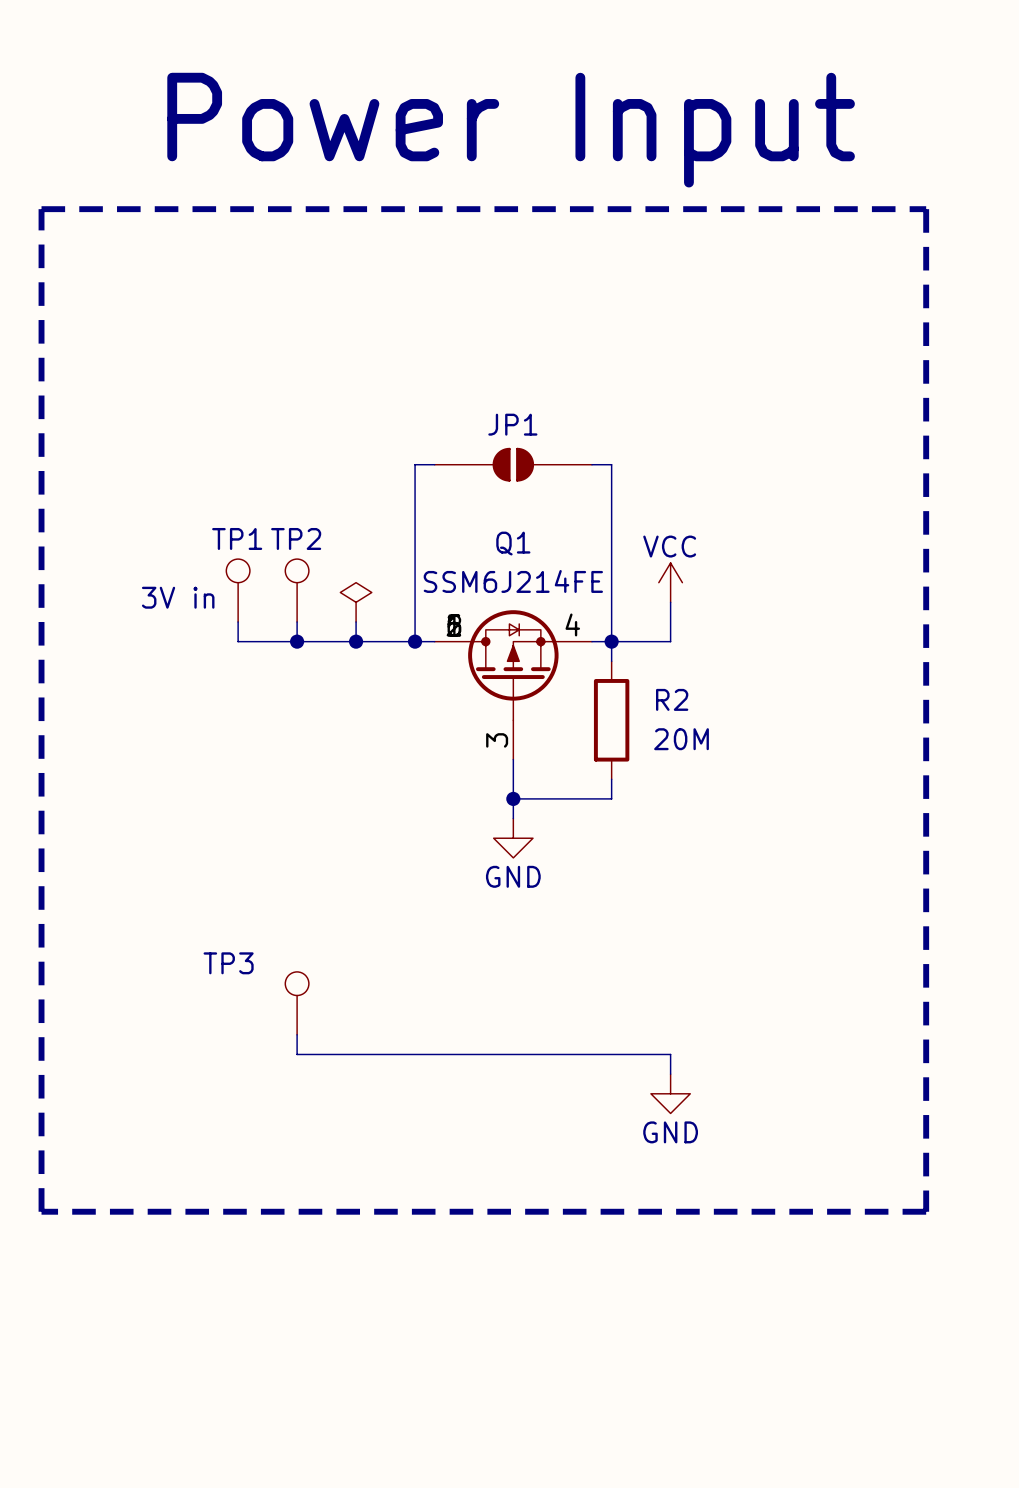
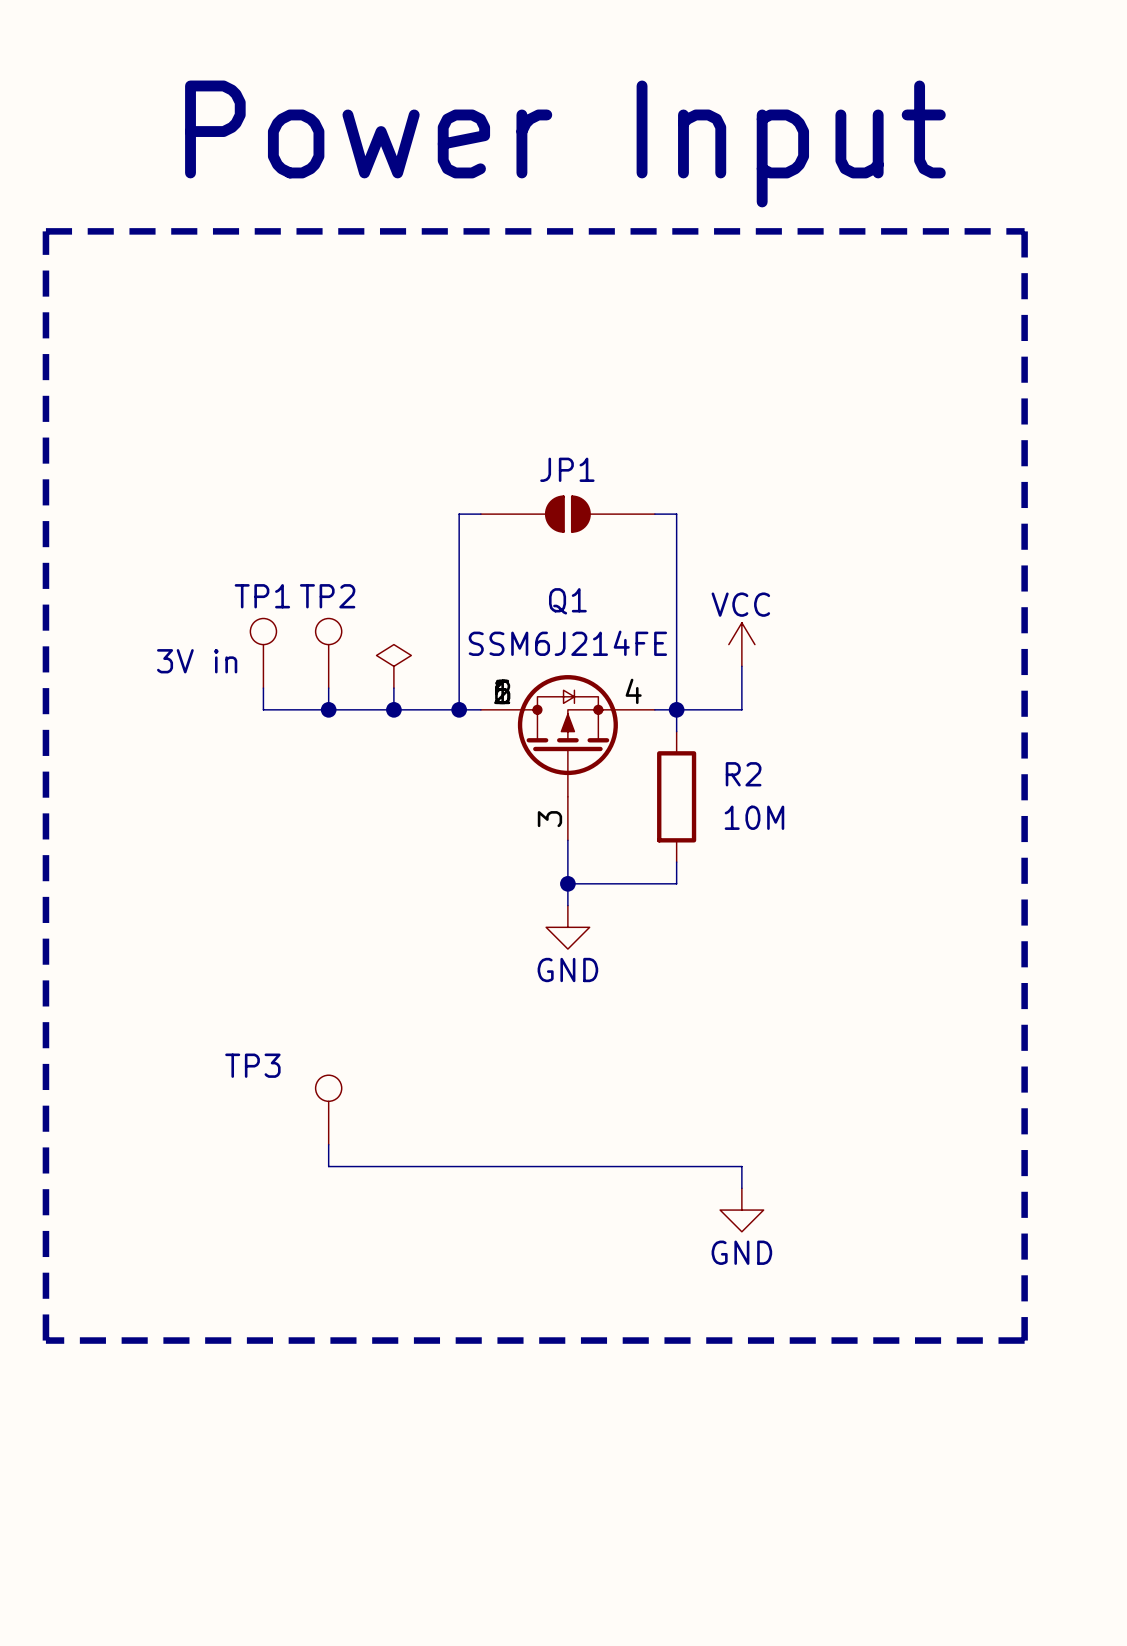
R2 value: 20M (681, 739) -> 10M (754, 817)

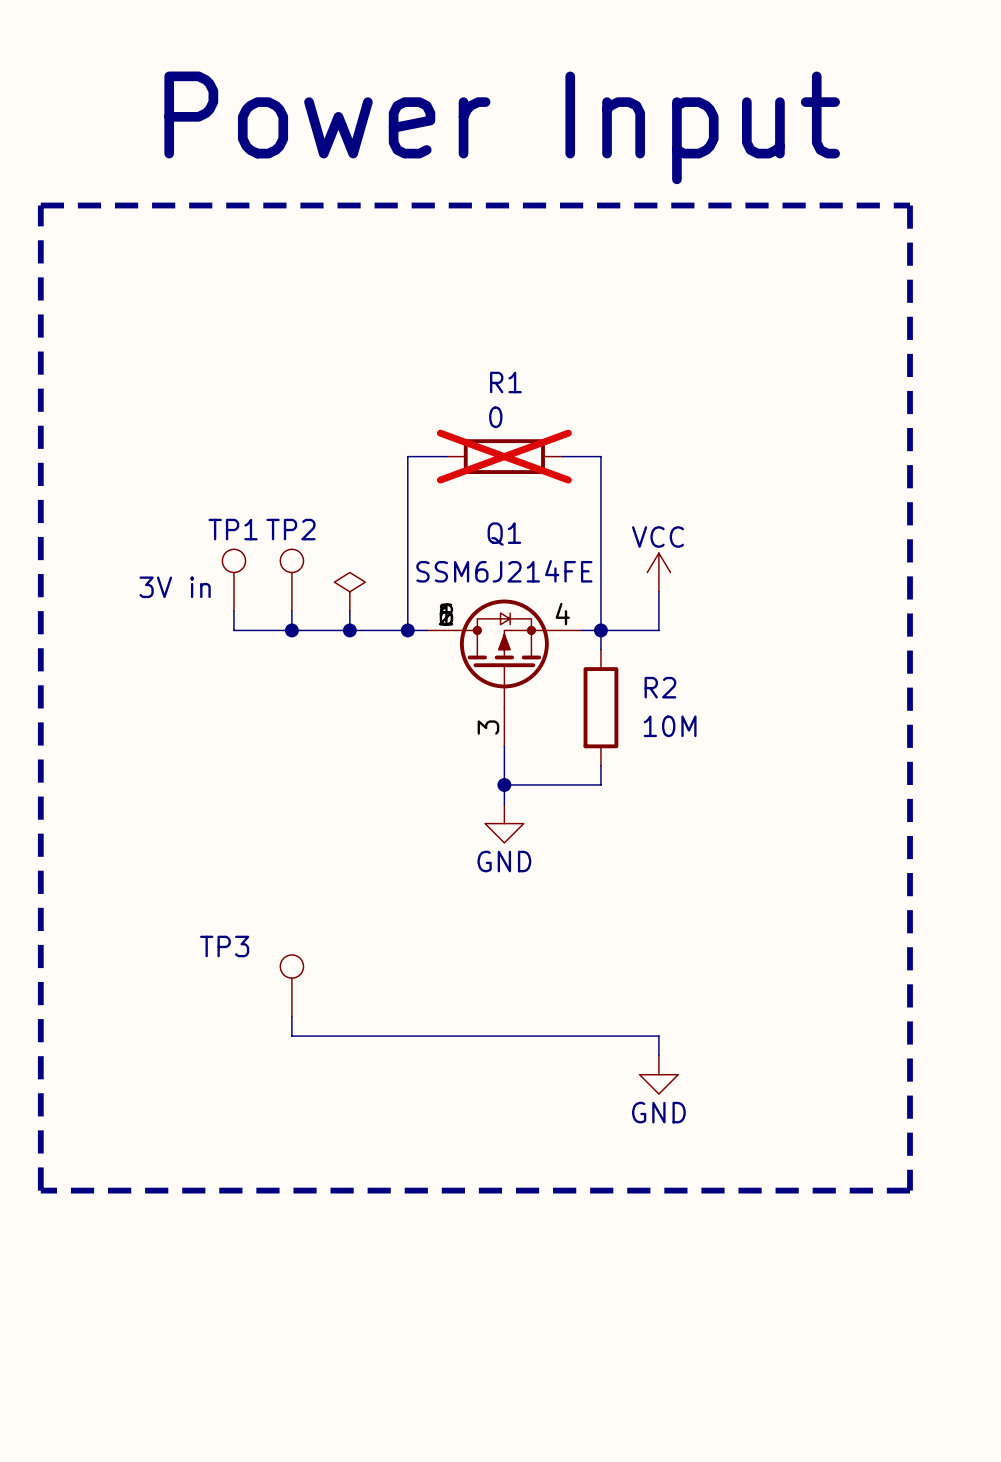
JP1: (567, 514) -> none
R1: none -> 0 (504, 456)

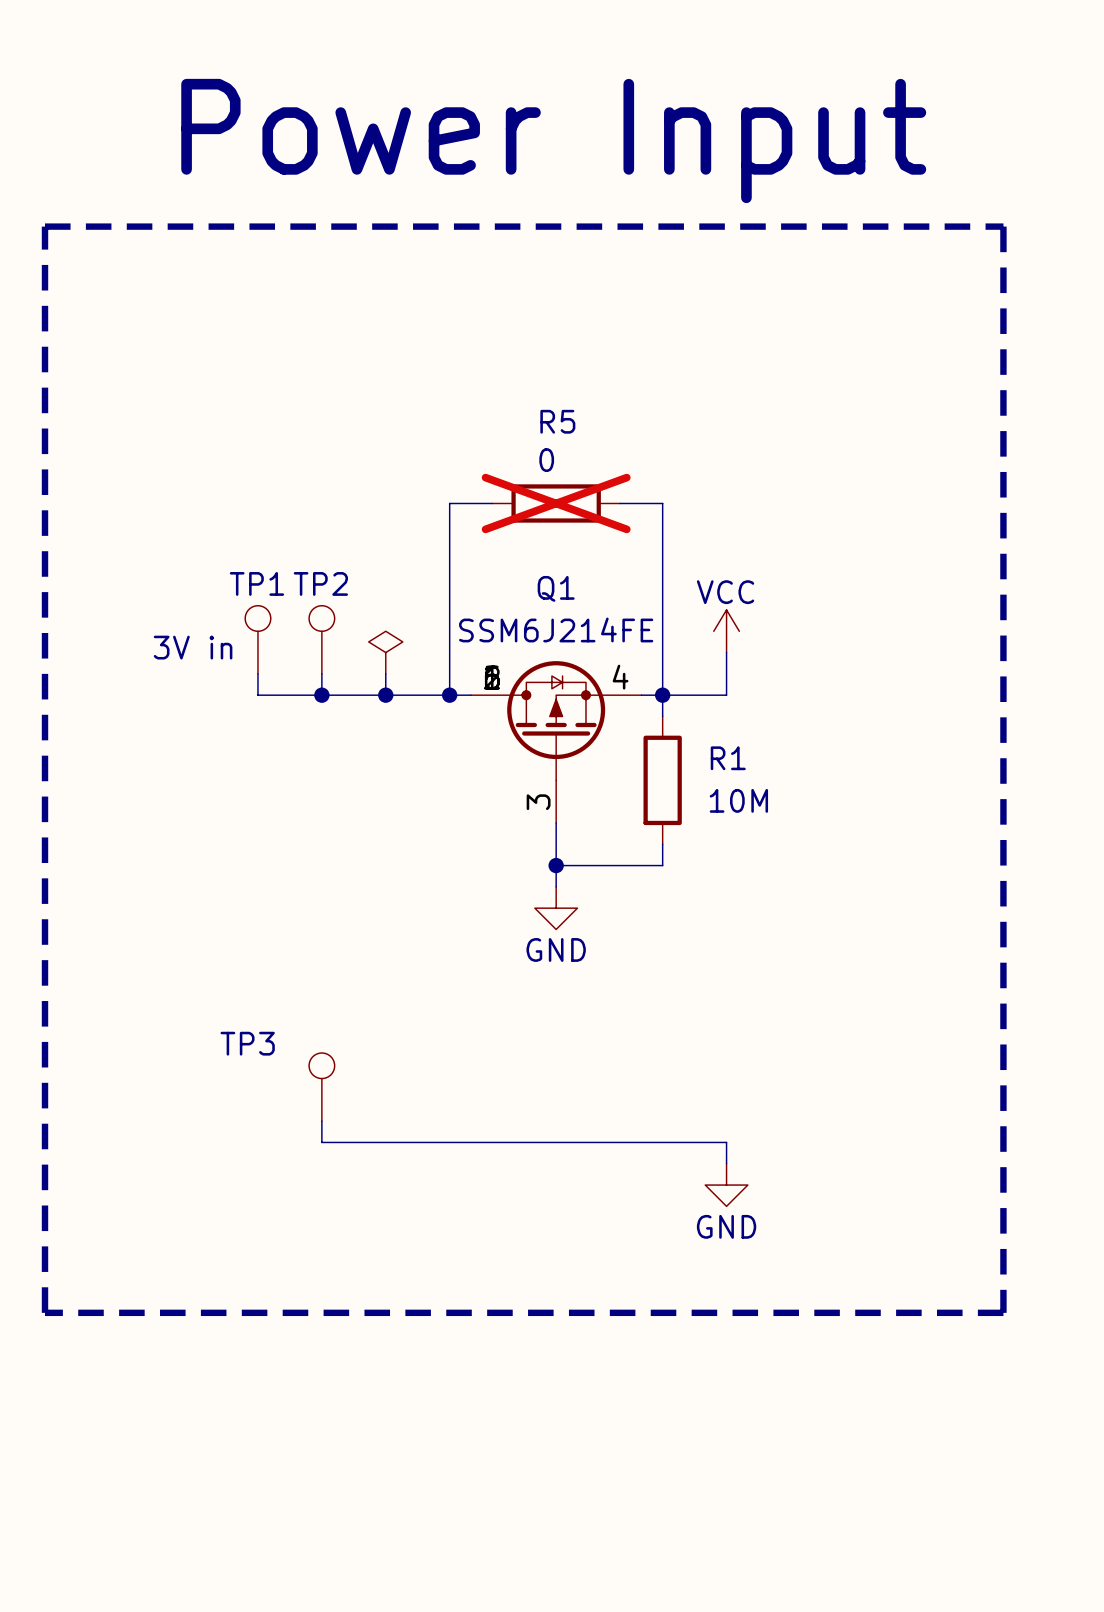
R1 name: R1 (505, 382) -> R5 (557, 421)
R2 name: R2 (660, 687) -> R1 (728, 758)

